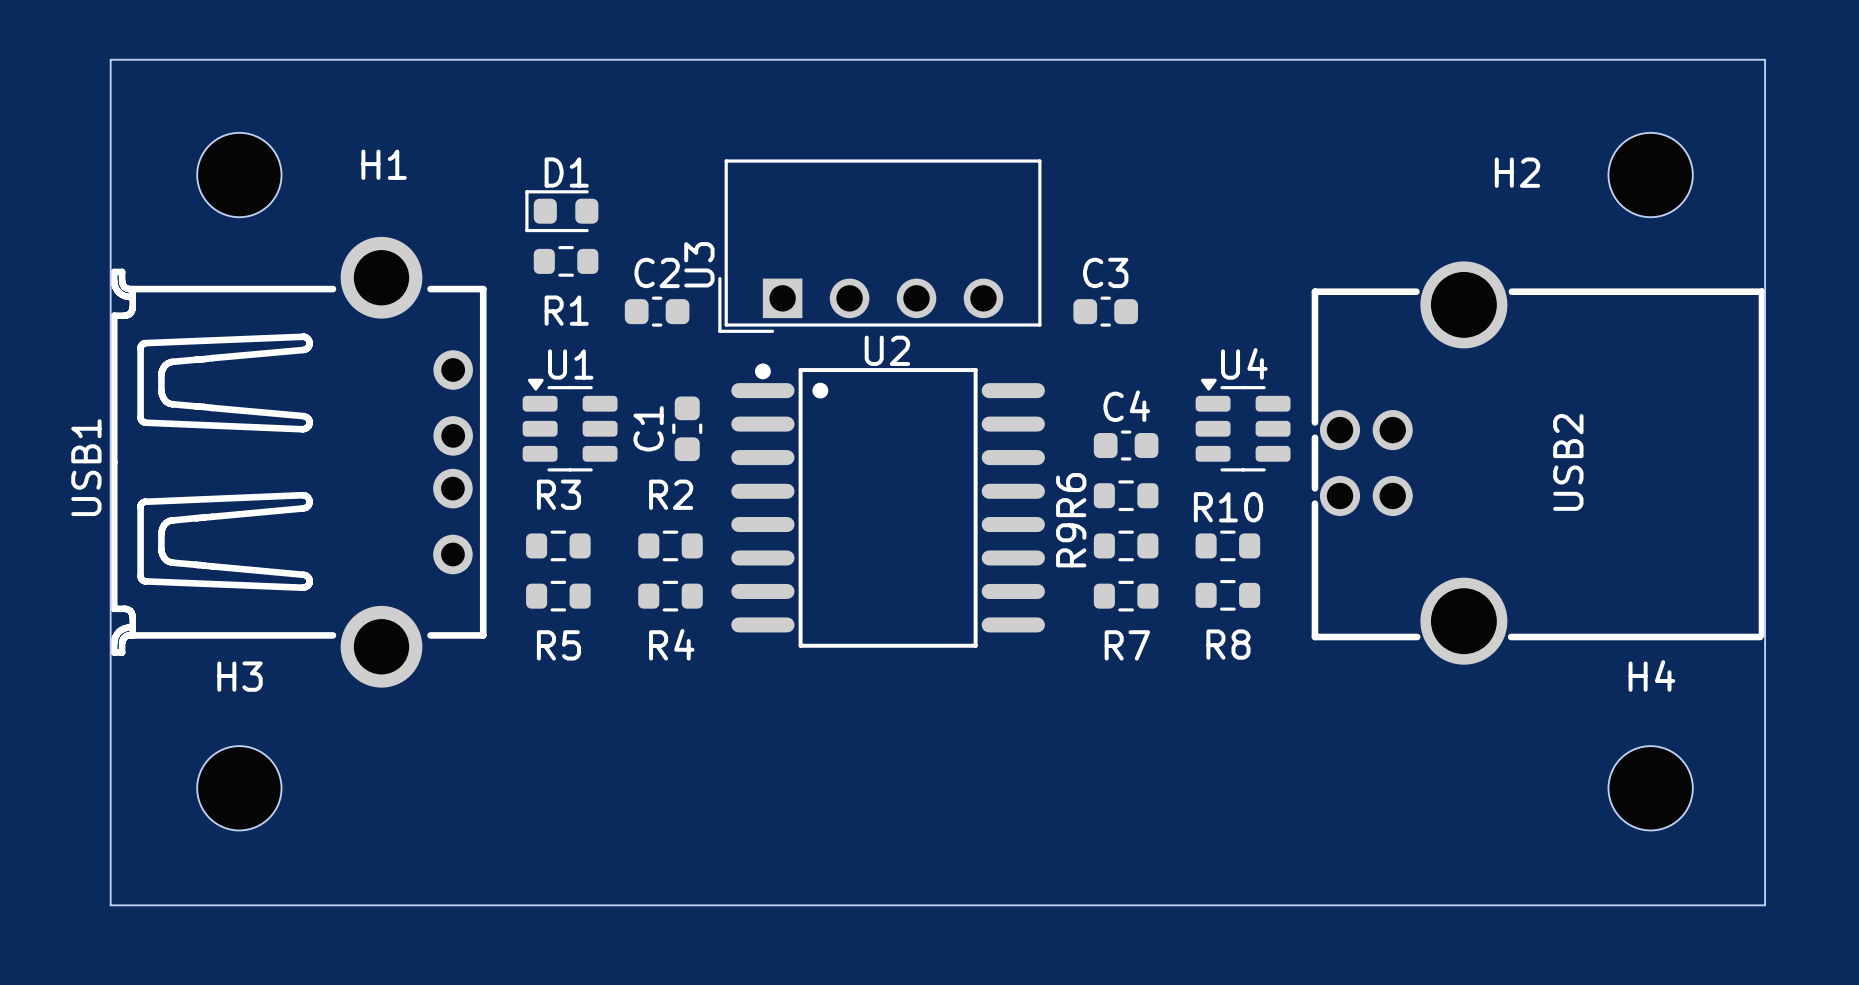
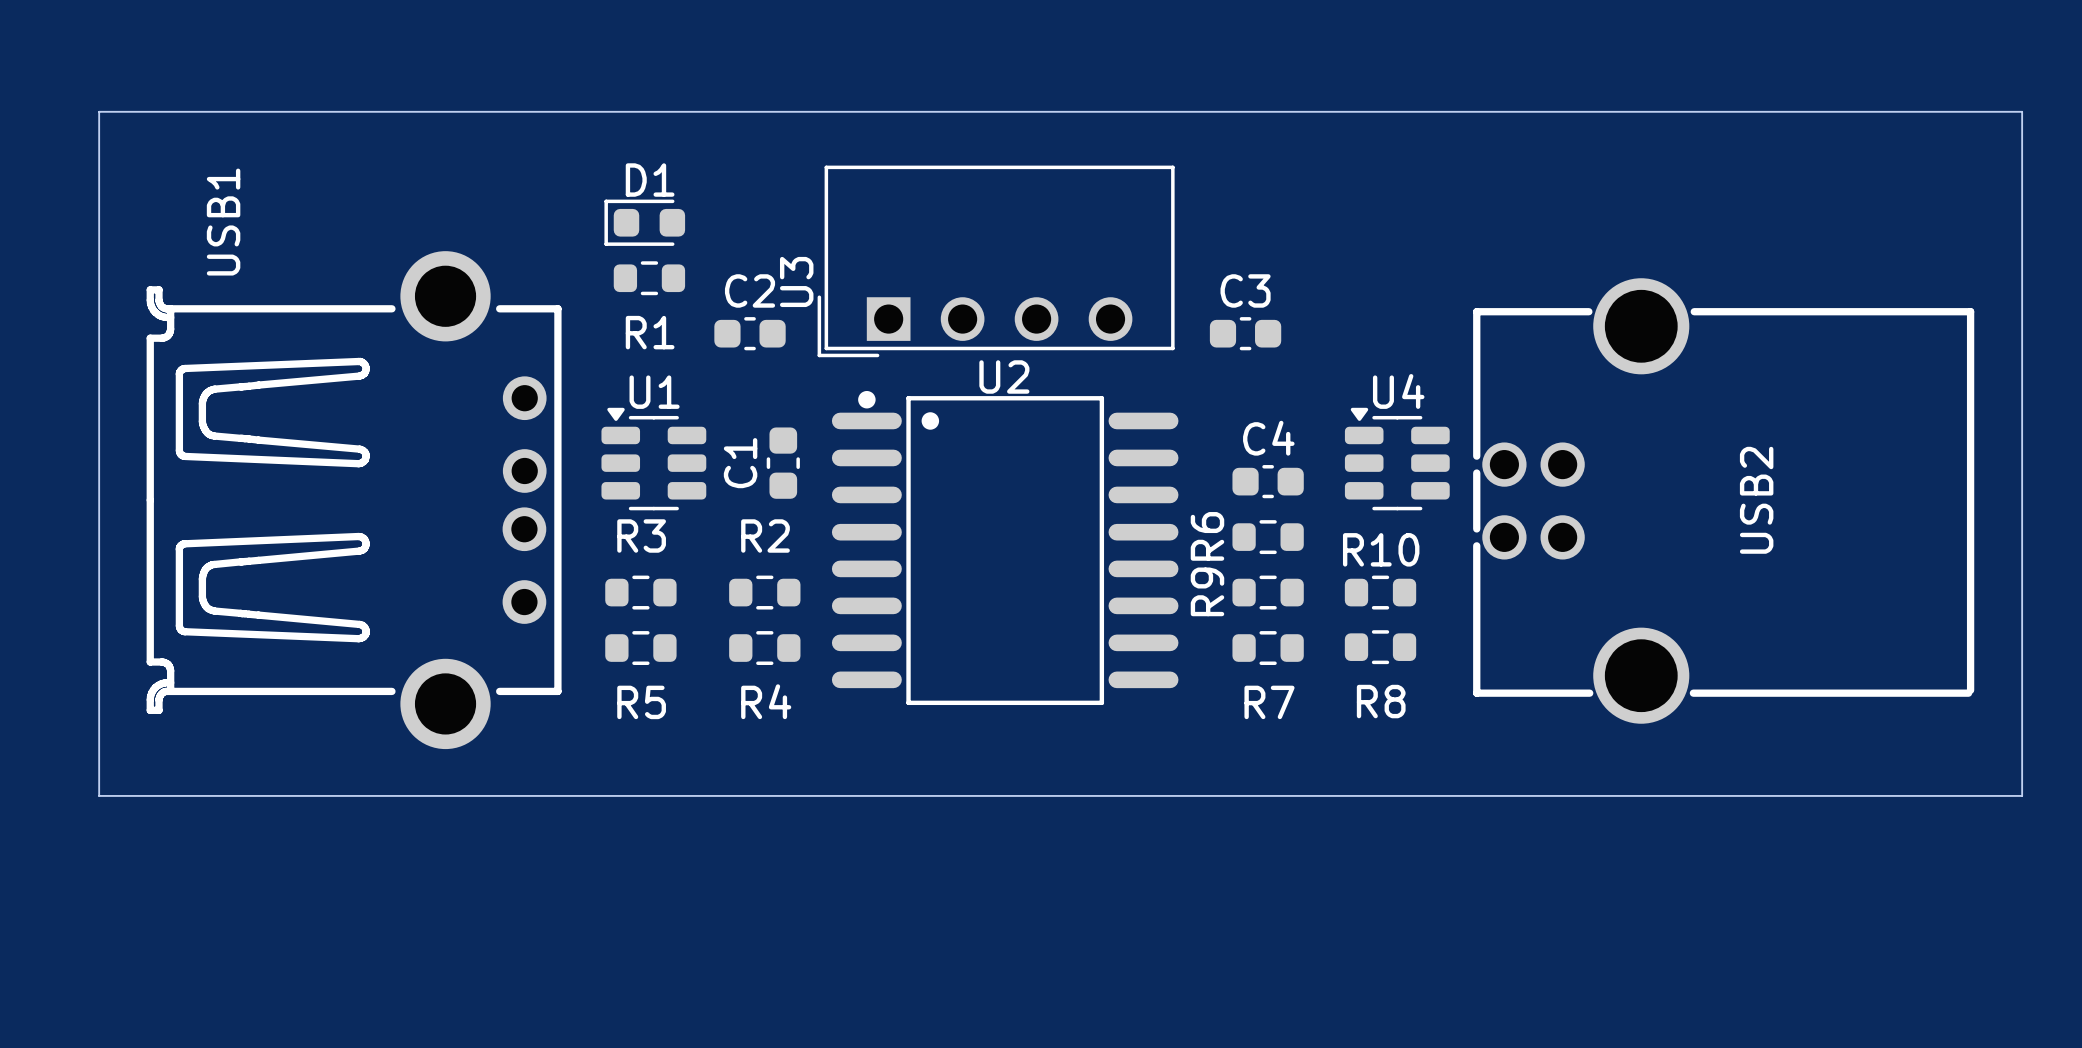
board edge: (110, 59) (1765, 59) (1765, 905) (110, 905) (110, 59) -> (99, 111) (99, 795) (2022, 795) (2022, 111) (99, 111)
H1: (239, 175) -> none
H2: (1650, 175) -> none
USB1 name position: USB1 (86, 467) -> USB1 (223, 222)
H3: (239, 788) -> none
H4: (1650, 788) -> none

